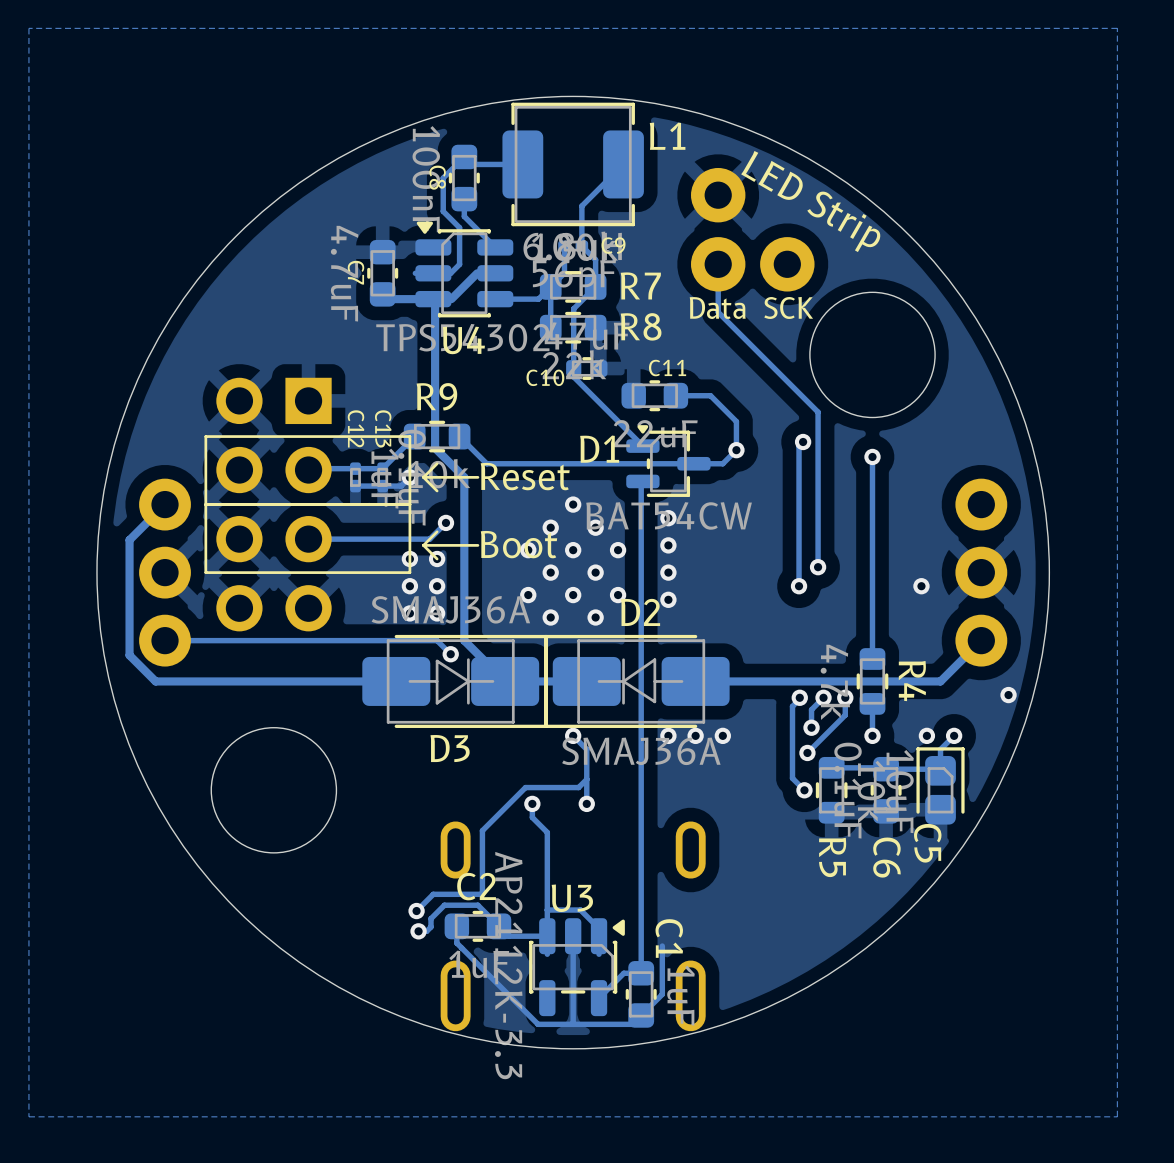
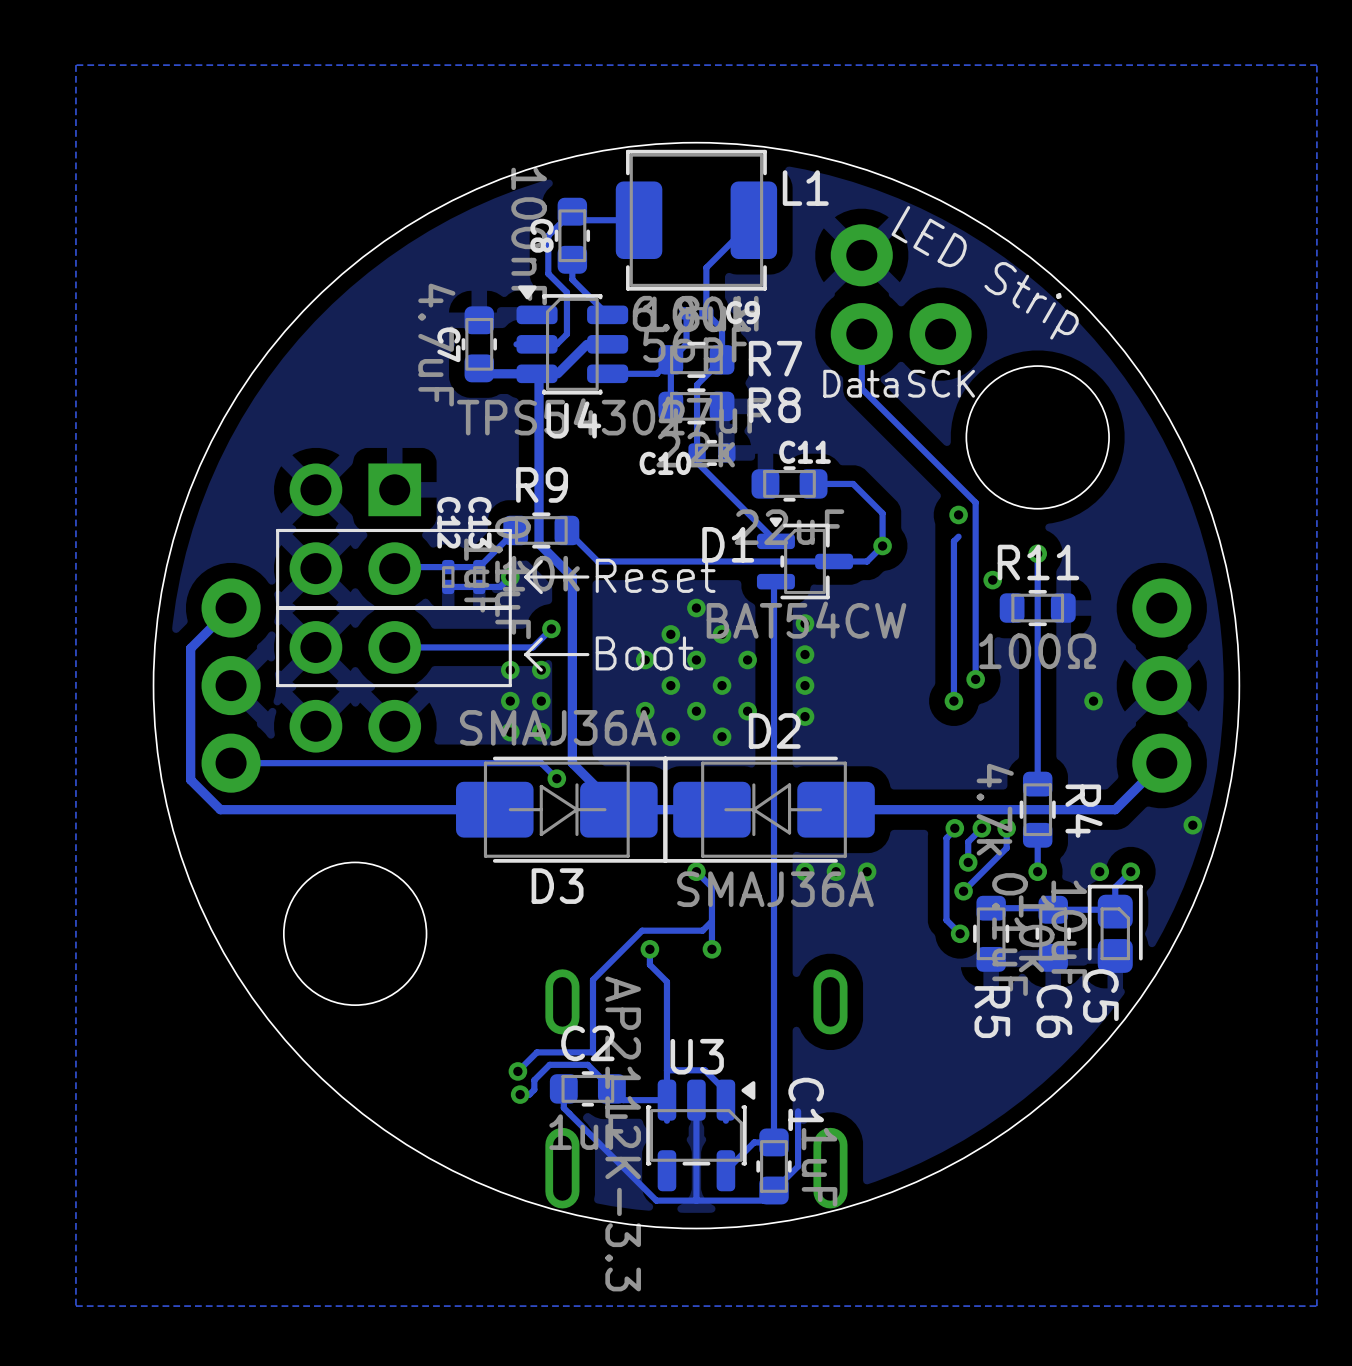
via position: (803, 441) -> (958, 514)
via: none -> (992, 580)
R11: none -> 100Ω (1037, 608)

